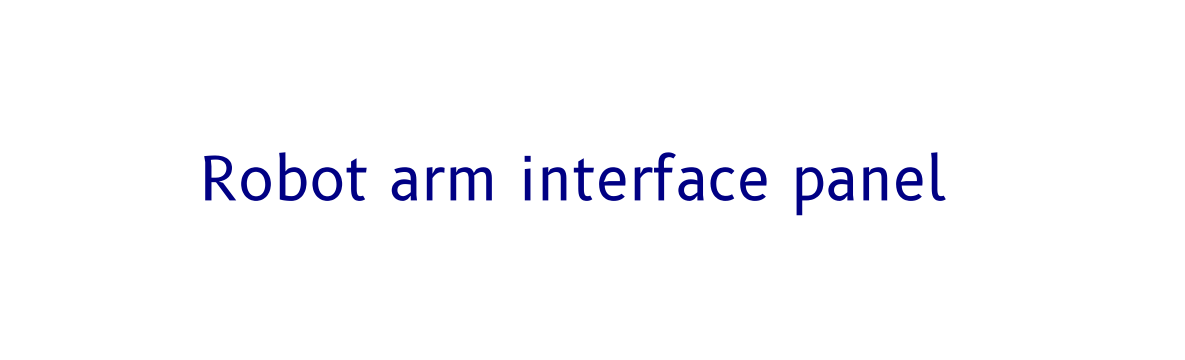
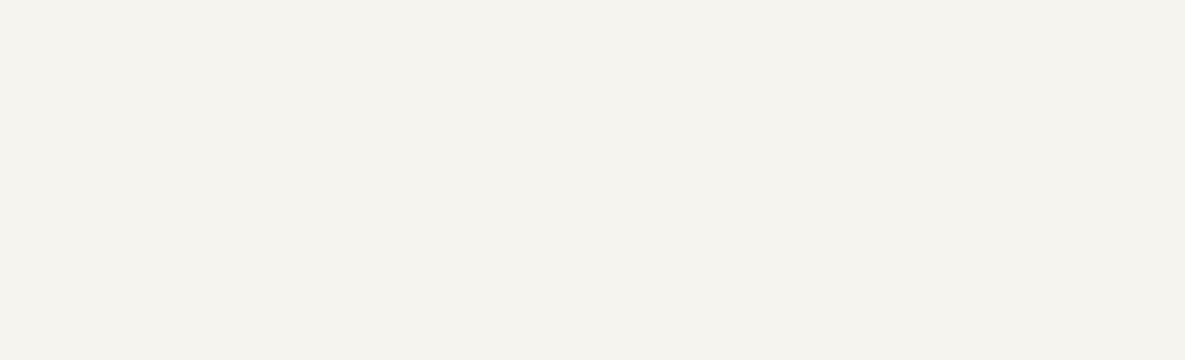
text: Robot arm interface panel (574, 183) -> none

